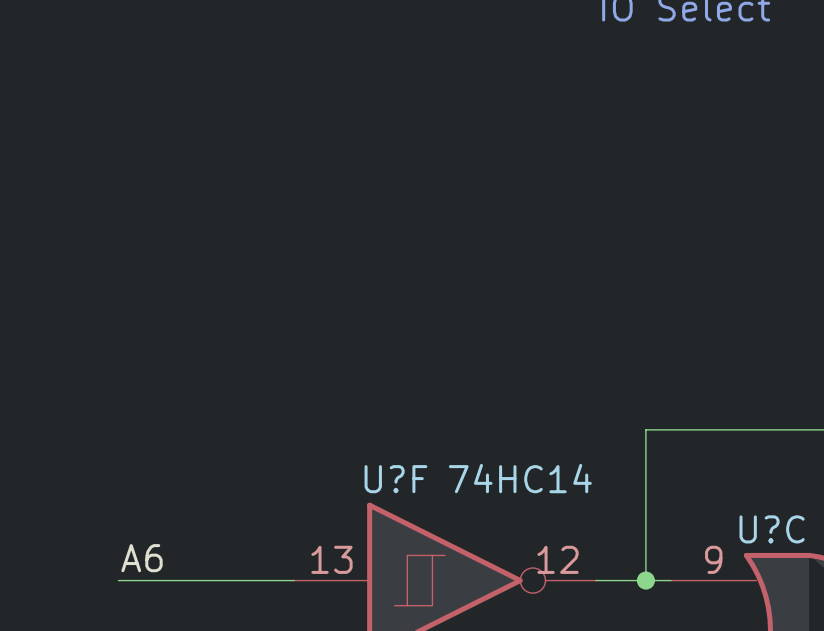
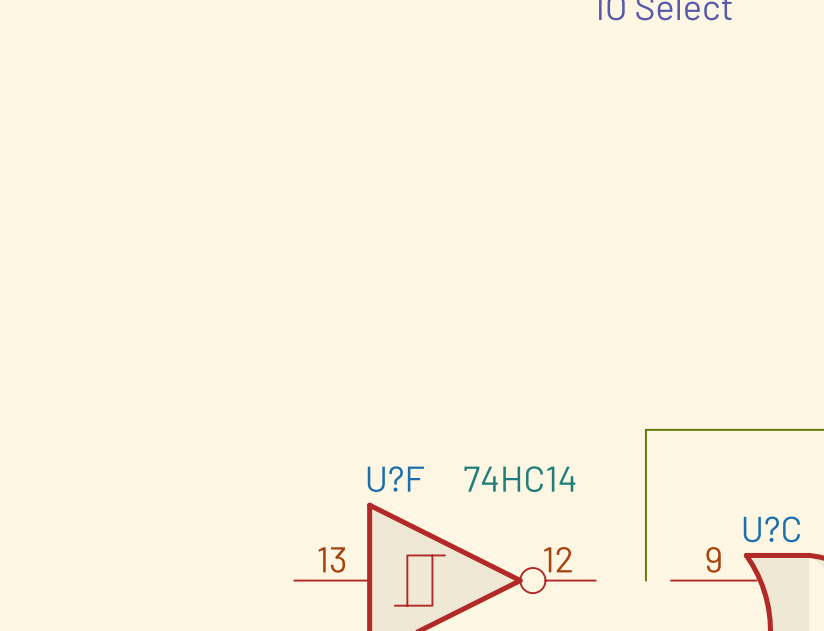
label: A6 (142, 558) -> none
wire: (118, 580) (294, 580) -> none
wire: (595, 580) (671, 580) -> none
junction: (645, 580) -> none

